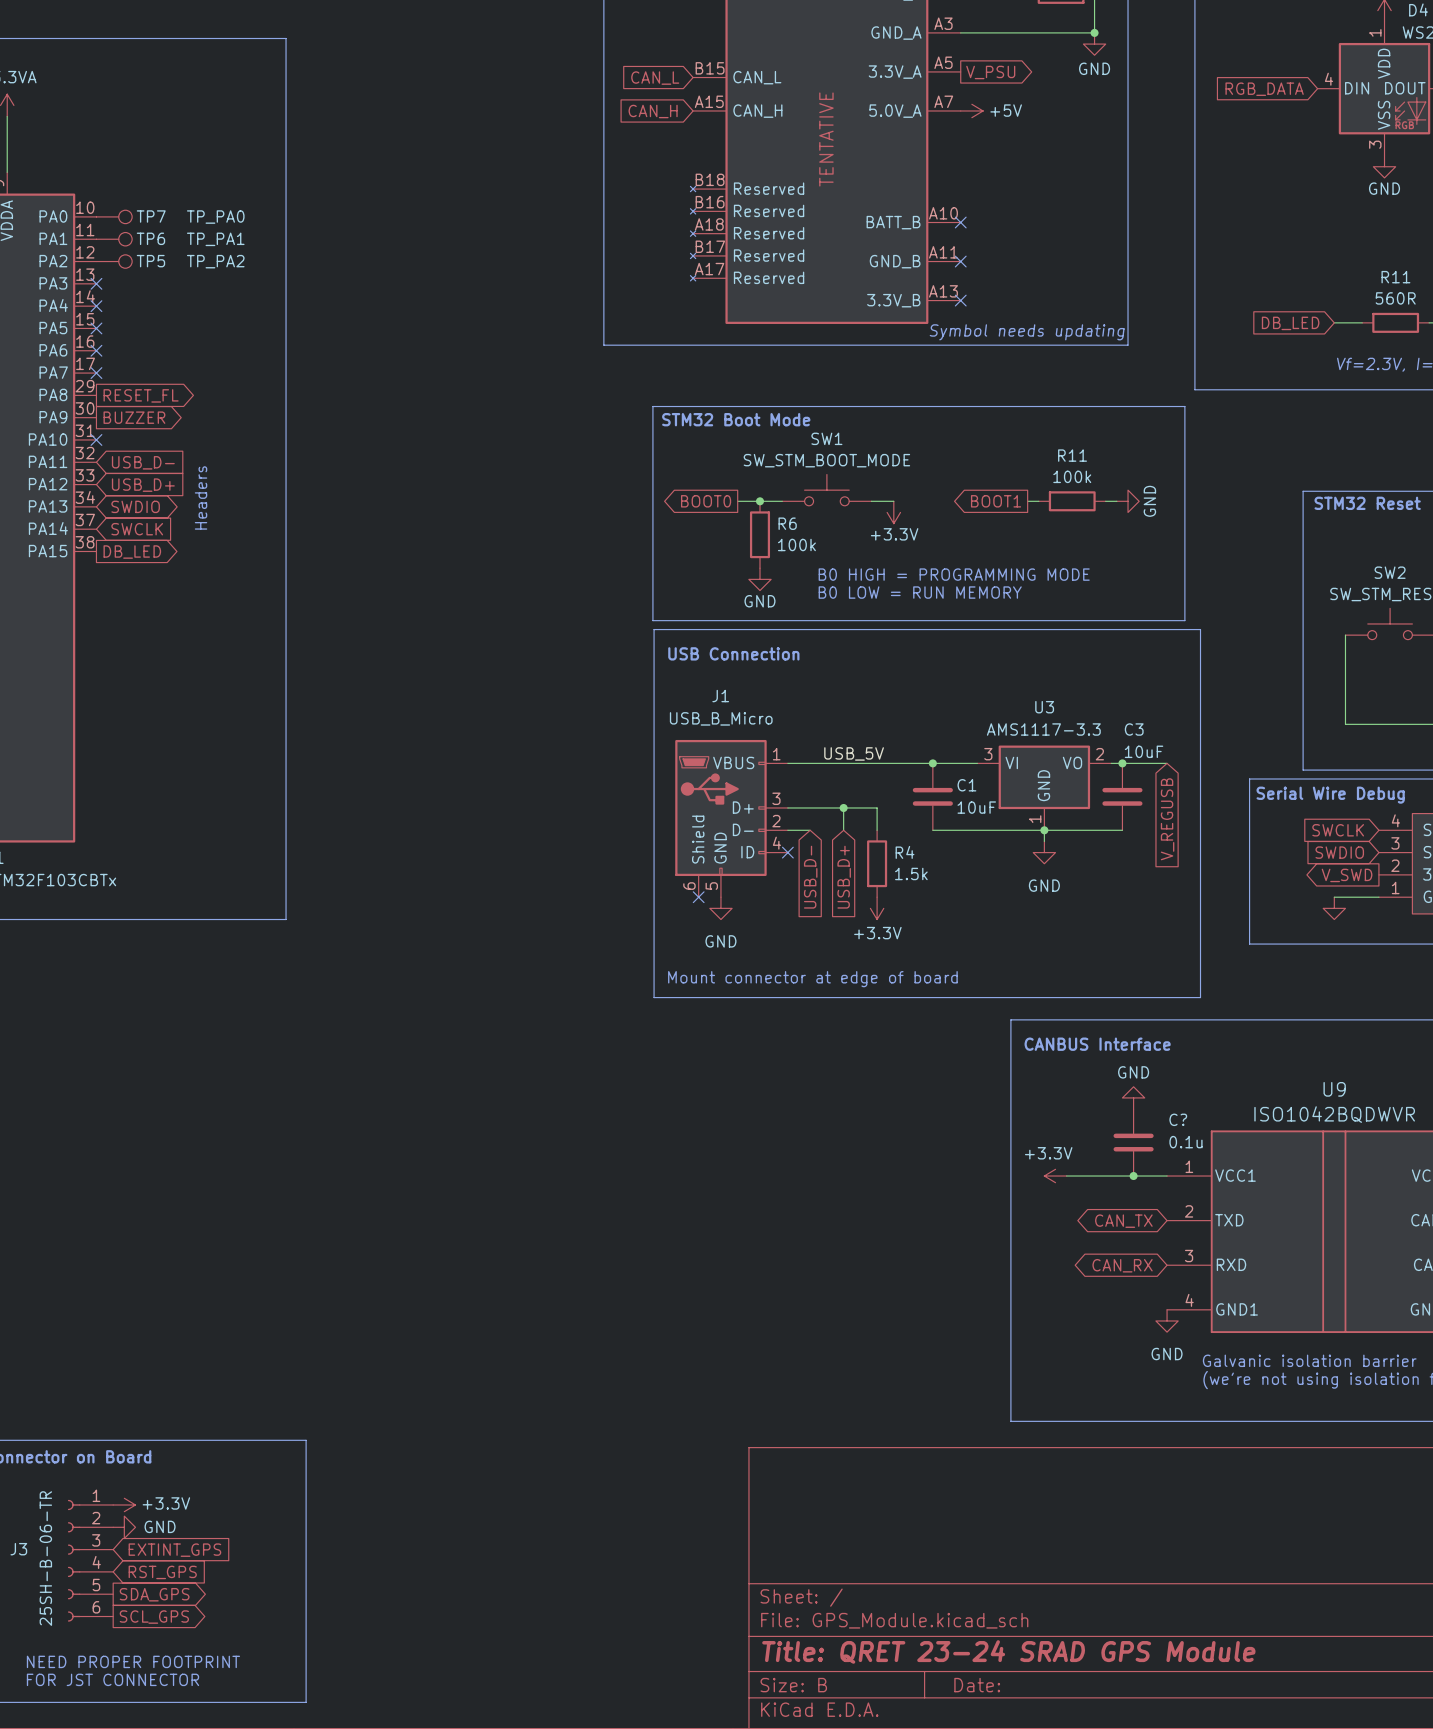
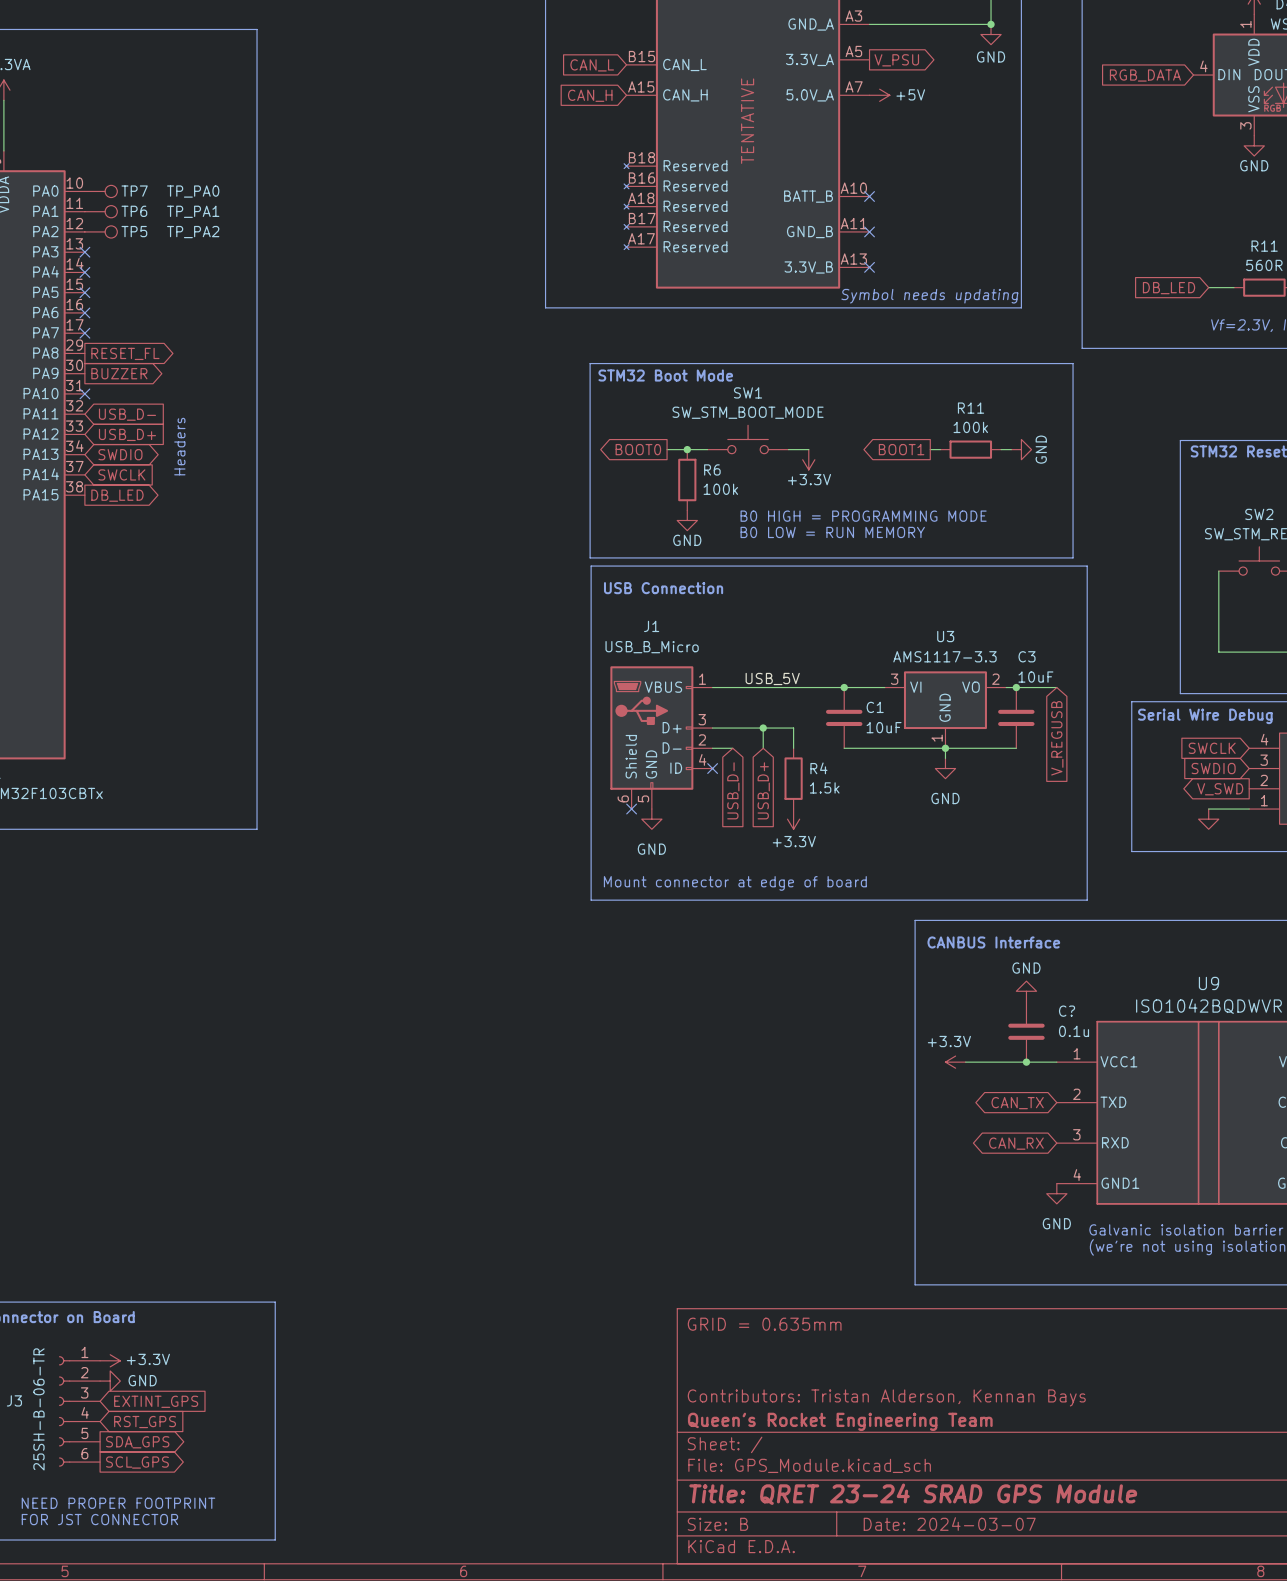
title block: none -> GRID = 0.635mm (764, 1324)
title block: none -> Contributors: Tristan Alderson, Kennan Bays (886, 1397)
title block: none -> Queen's Rocket Engineering Team (840, 1421)
title block: Date: (977, 1685) -> Date: 2024-03-07 (949, 1524)

